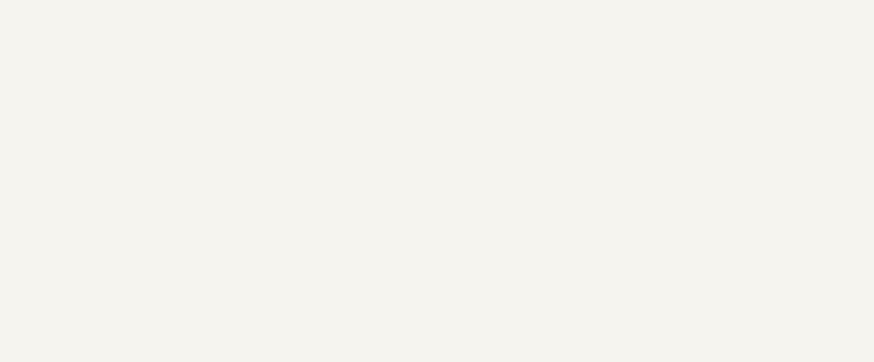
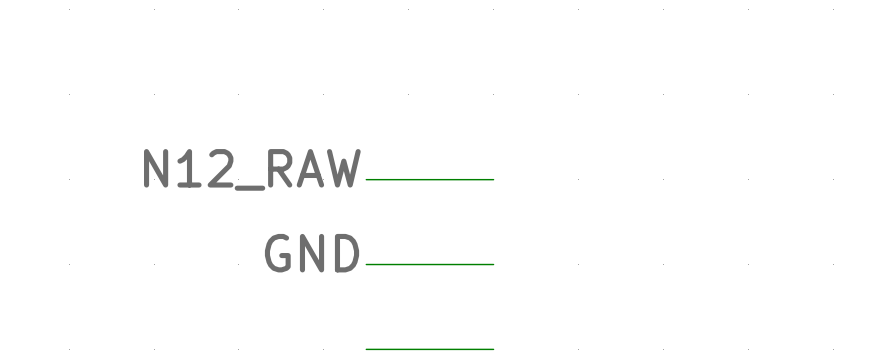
label: none -> N12_RAW (252, 169)
wire: none -> (366, 179) (493, 179)
label: none -> GND (312, 253)
wire: none -> (366, 264) (493, 264)
wire: none -> (366, 349) (493, 349)

